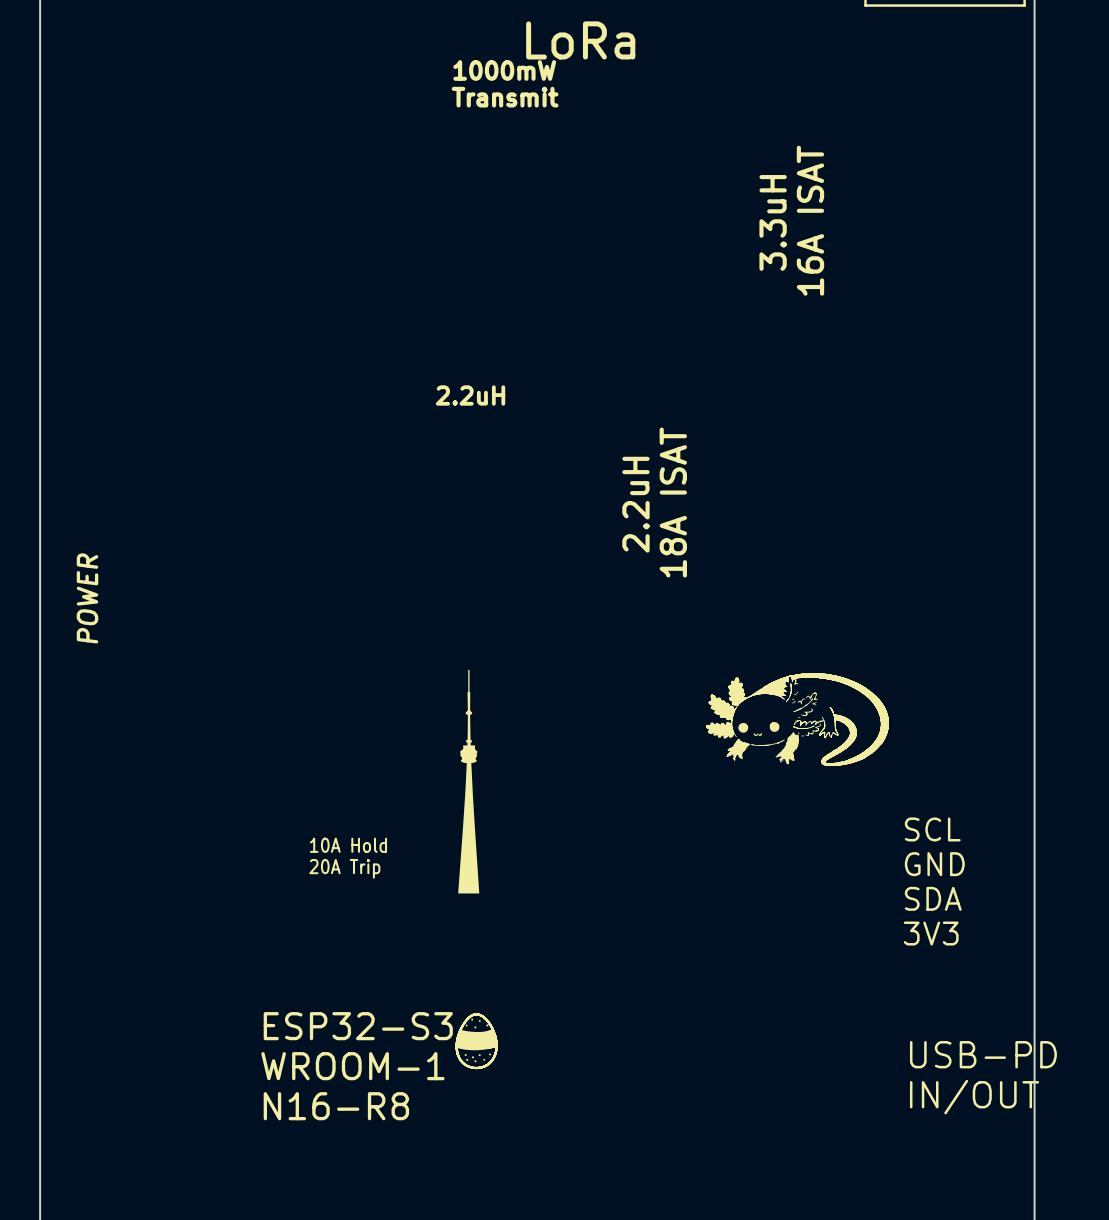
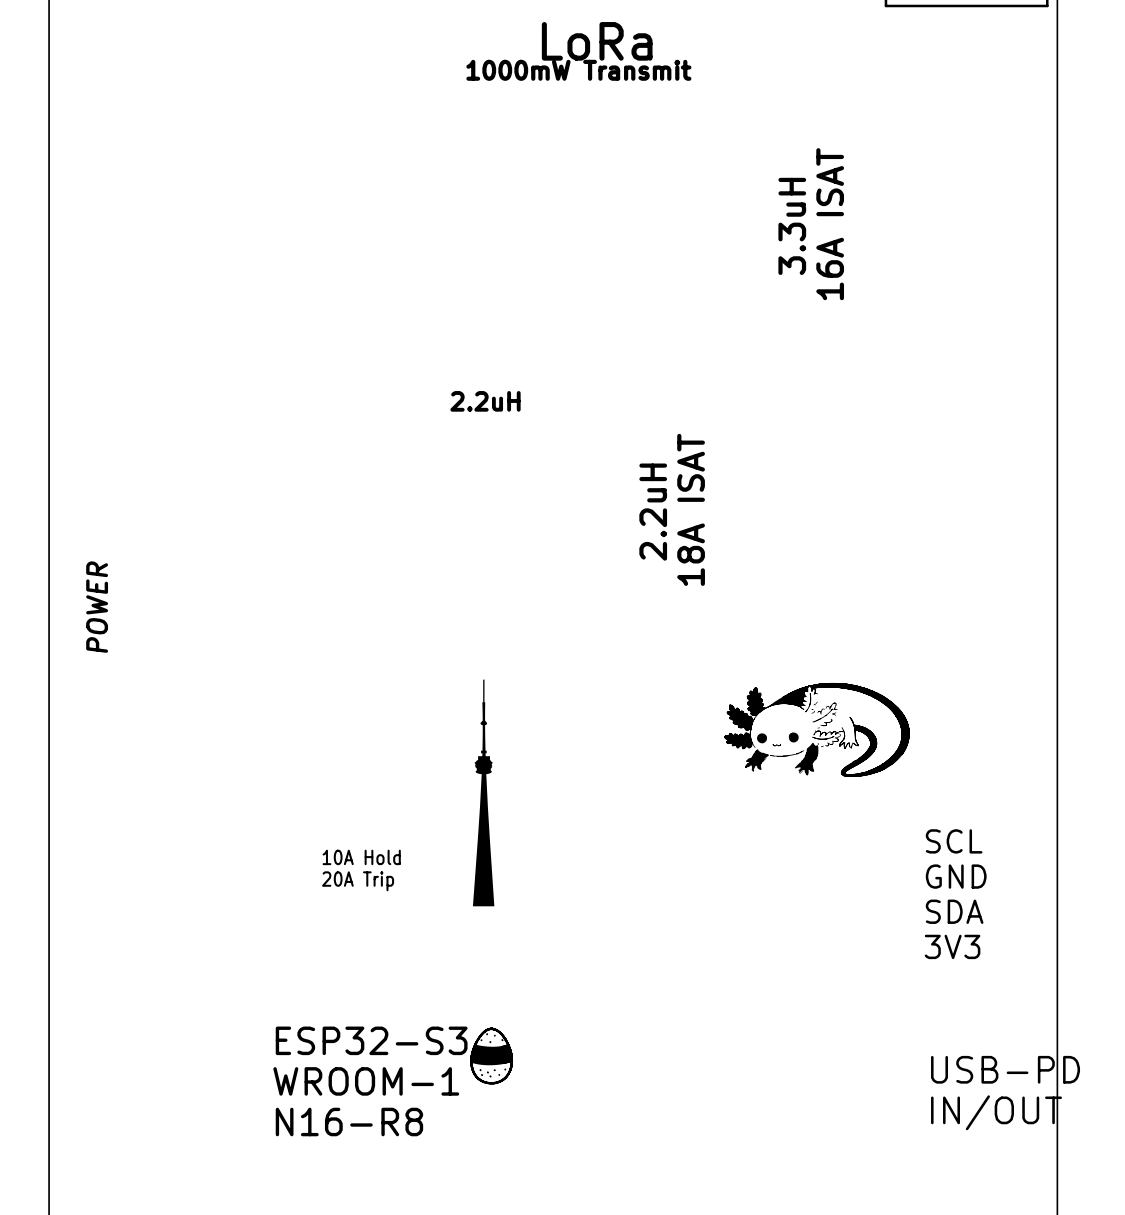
text: 1000mW (504, 70) -> 1000mW Transmit (578, 70)
text: Transmit (505, 97) -> none

